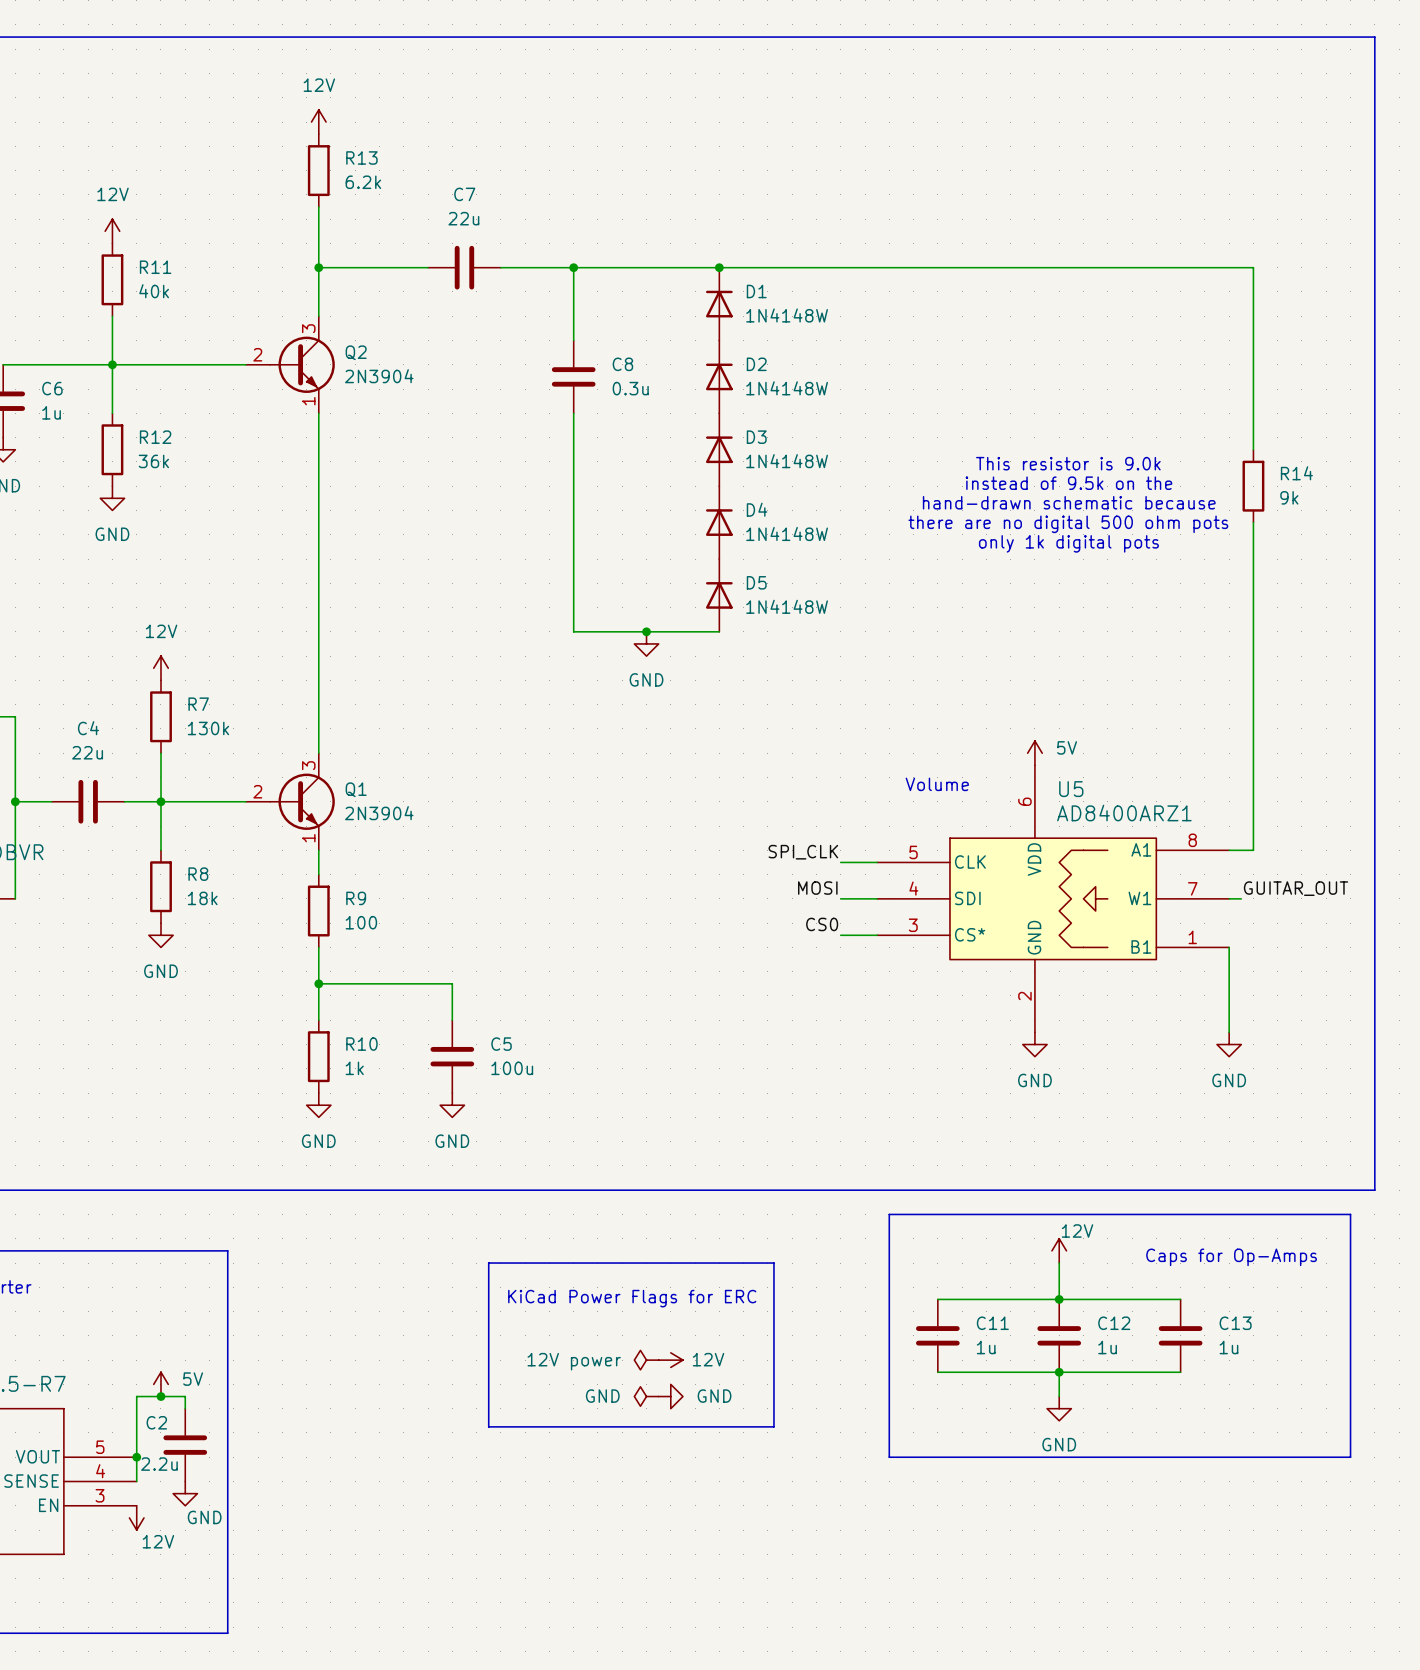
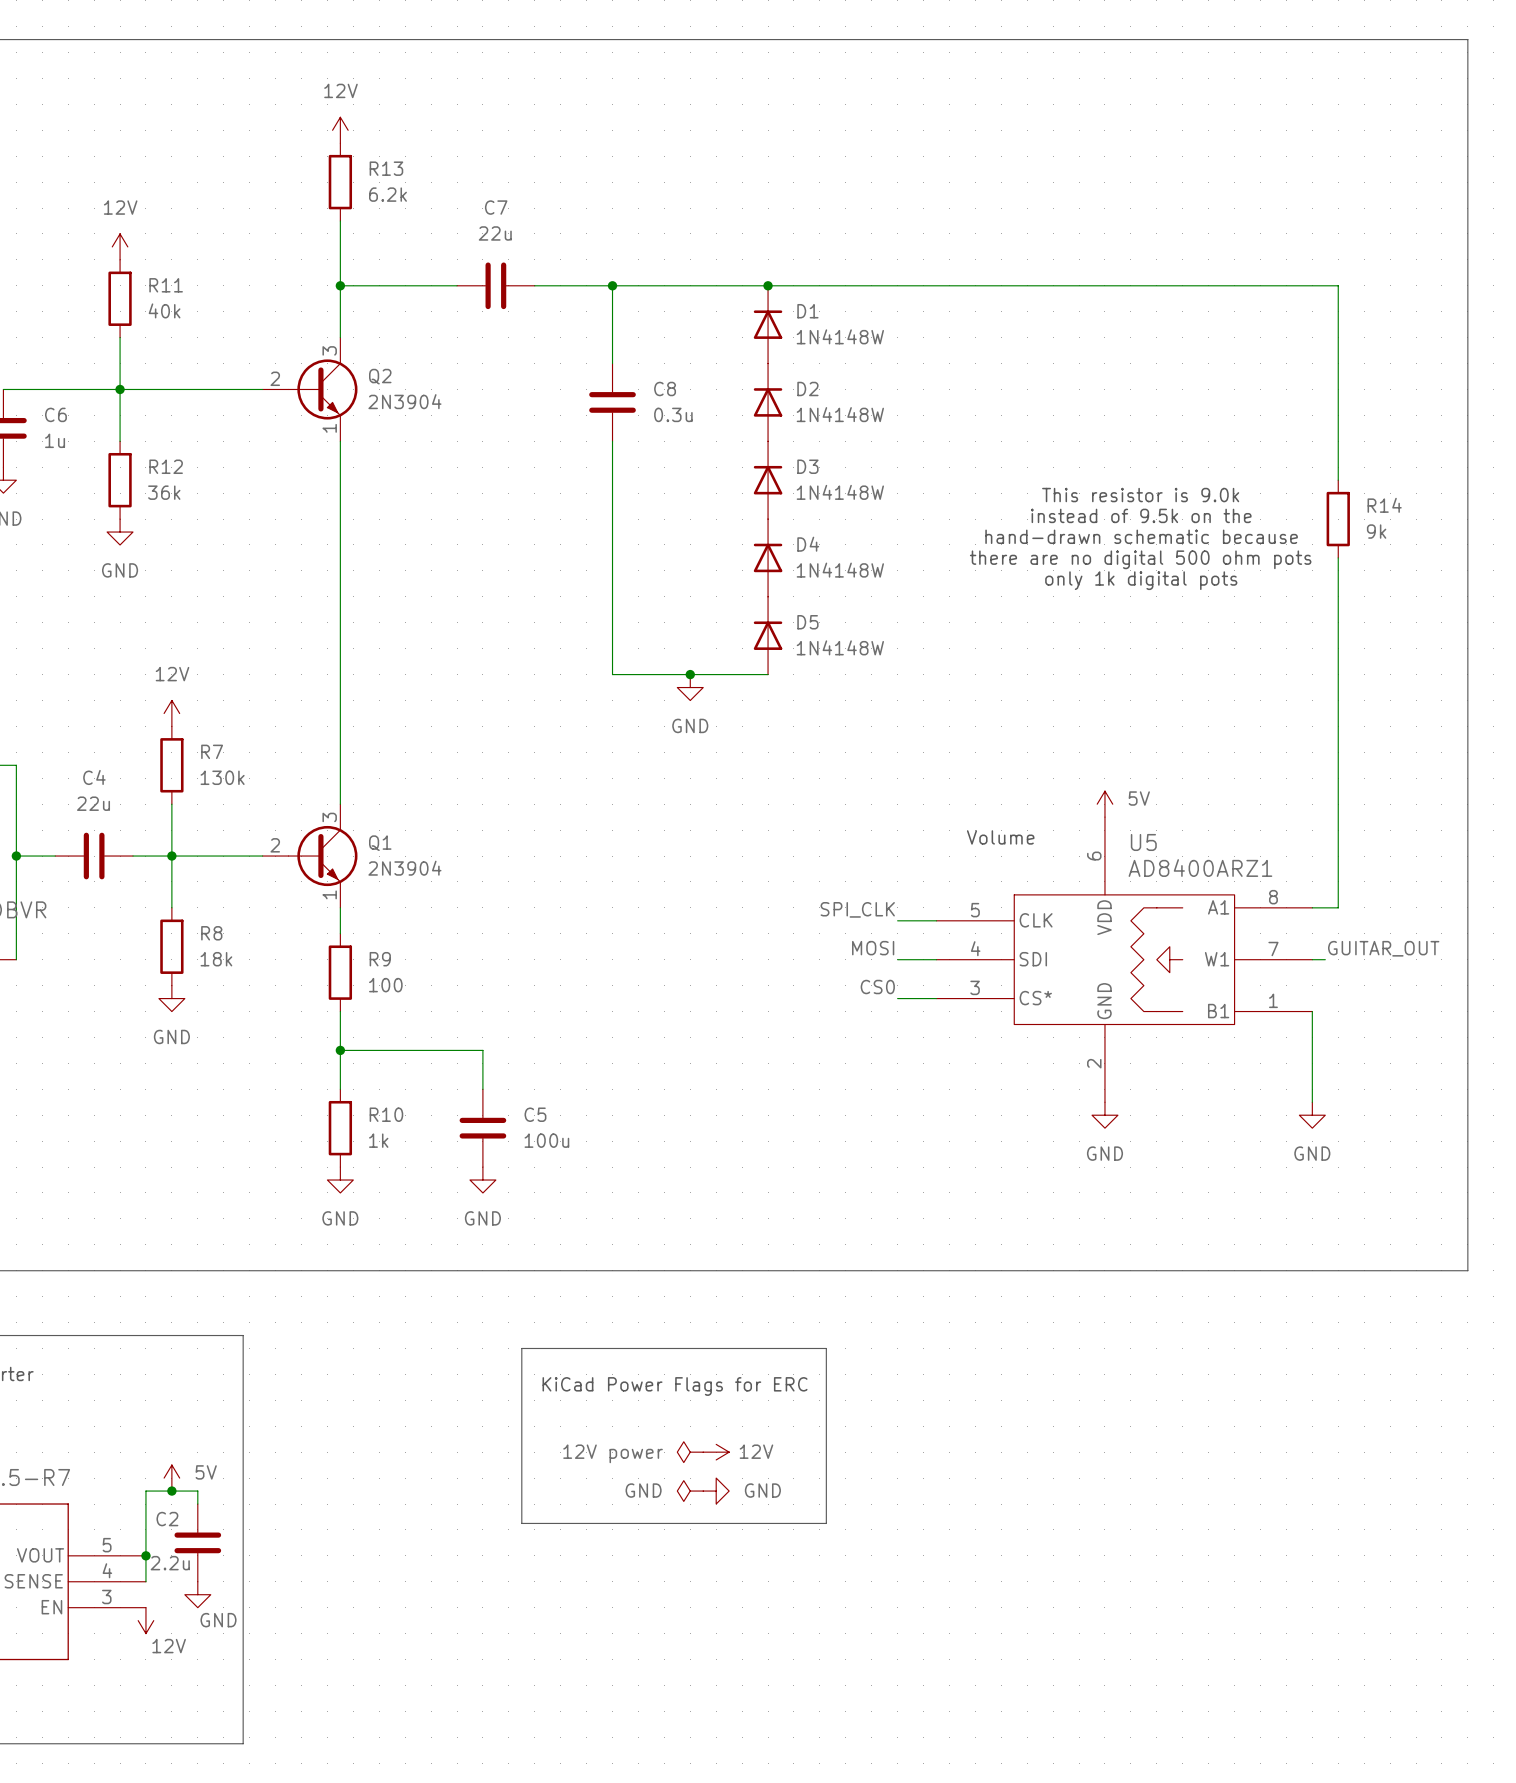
line: (889, 1214) (1350, 1214) (1350, 1457) (889, 1457) (889, 1214) -> none
power symbol: 12V (1059, 1250) -> none
text: Caps for Op-Amps (1231, 1257) -> none
wire: (1059, 1263) (1059, 1299) -> none
wire: (937, 1299) (1180, 1299) -> none
junction: (1059, 1299) -> none
C11: 1u (937, 1335) -> none
C12: 1u (1059, 1335) -> none
C13: 1u (1180, 1335) -> none
wire: (937, 1372) (1180, 1372) -> none
wire: (1059, 1372) (1059, 1396) -> none
junction: (1059, 1372) -> none
power symbol: GND (1059, 1408) -> none

